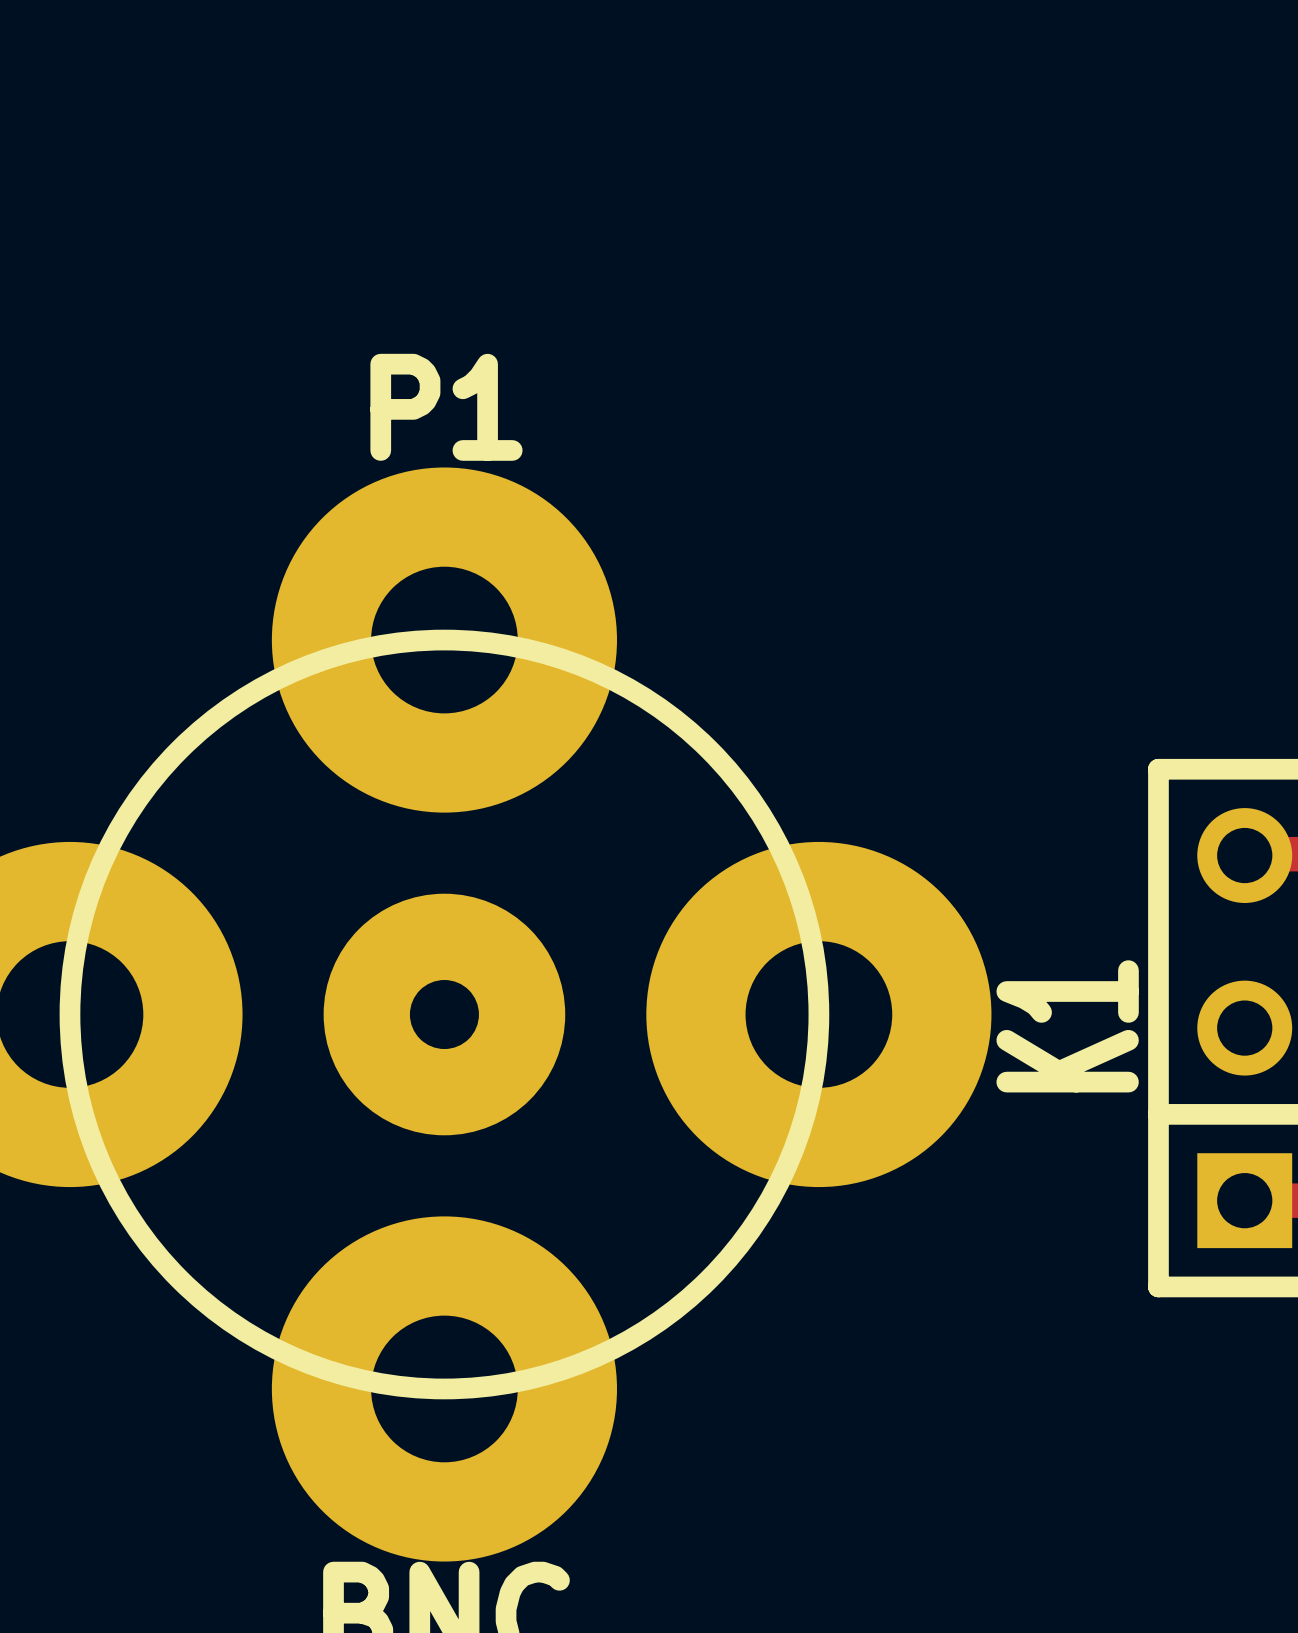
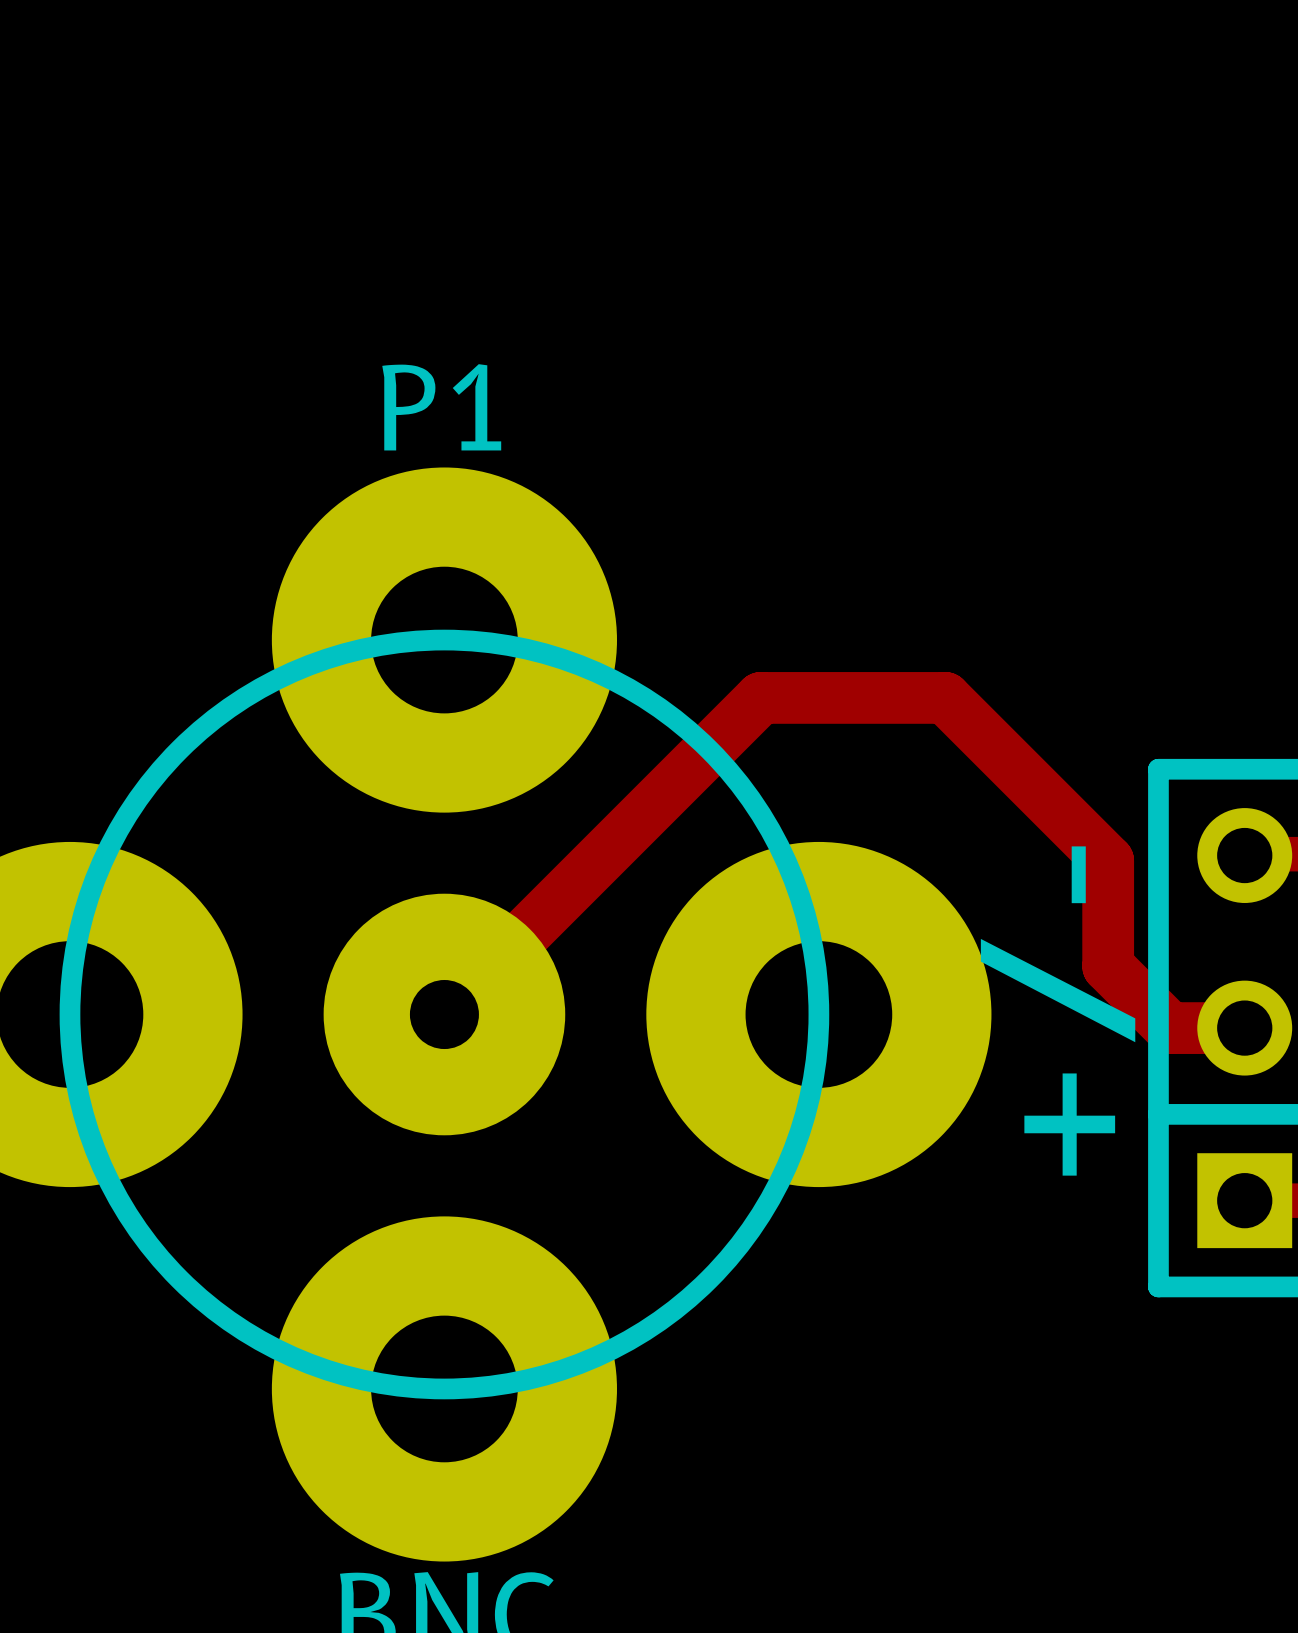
track: none -> (444, 1014) (761, 697) (945, 697) (1108, 860) (1108, 966) (1170, 1028) (1244, 1028)
K1 name: K1 (1067, 1026) -> +/- (1058, 1011)

